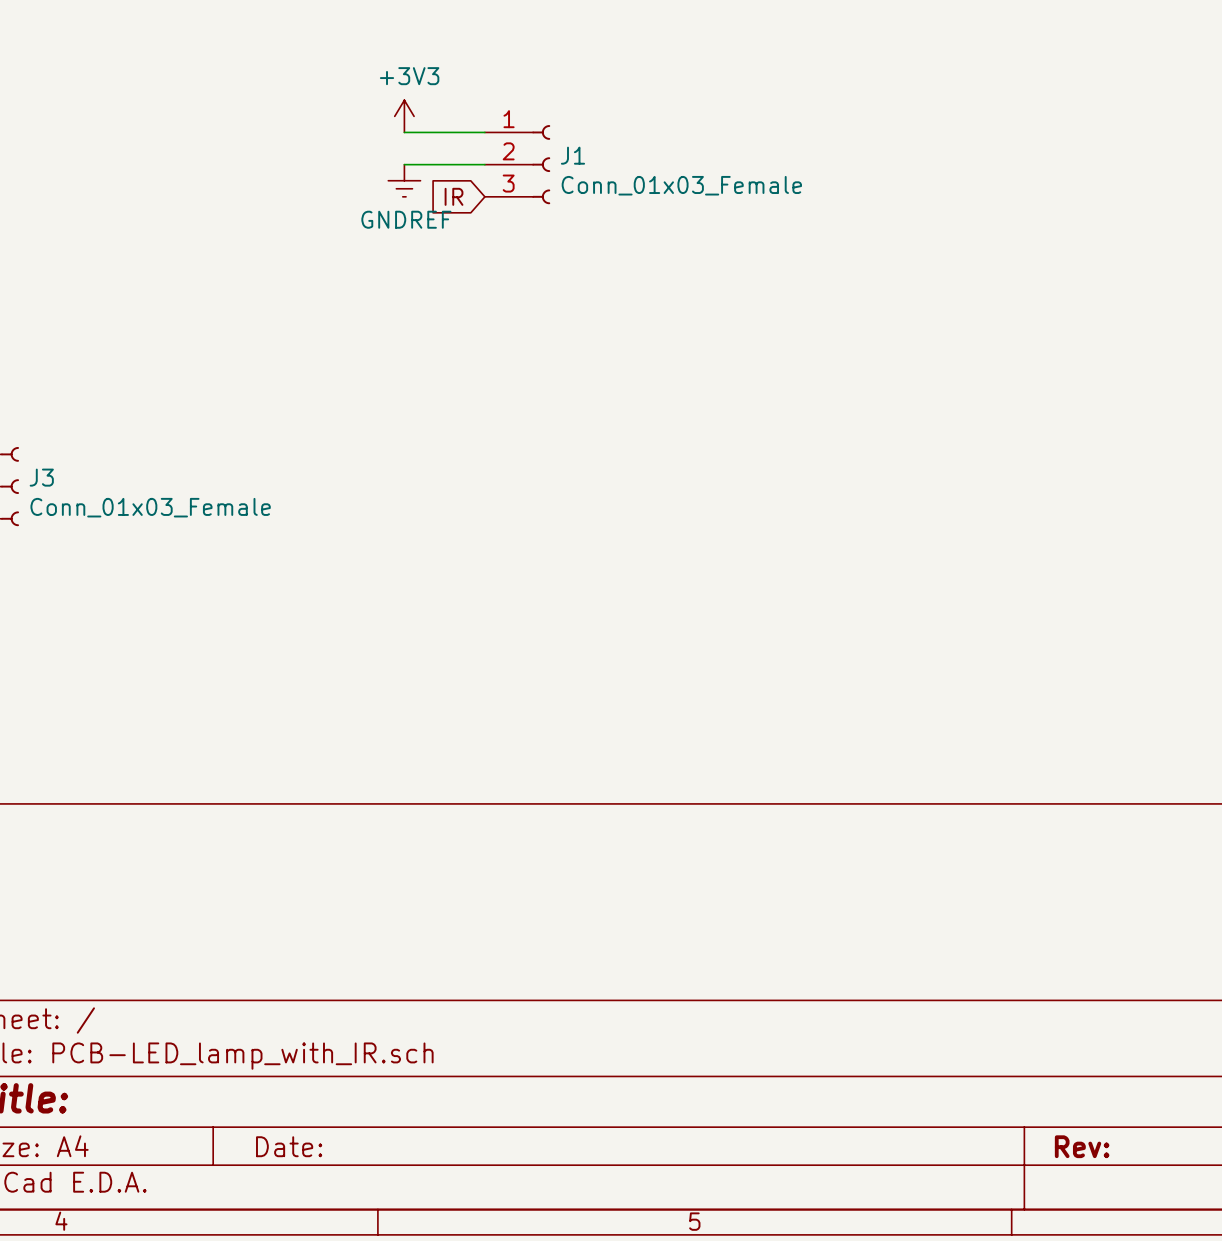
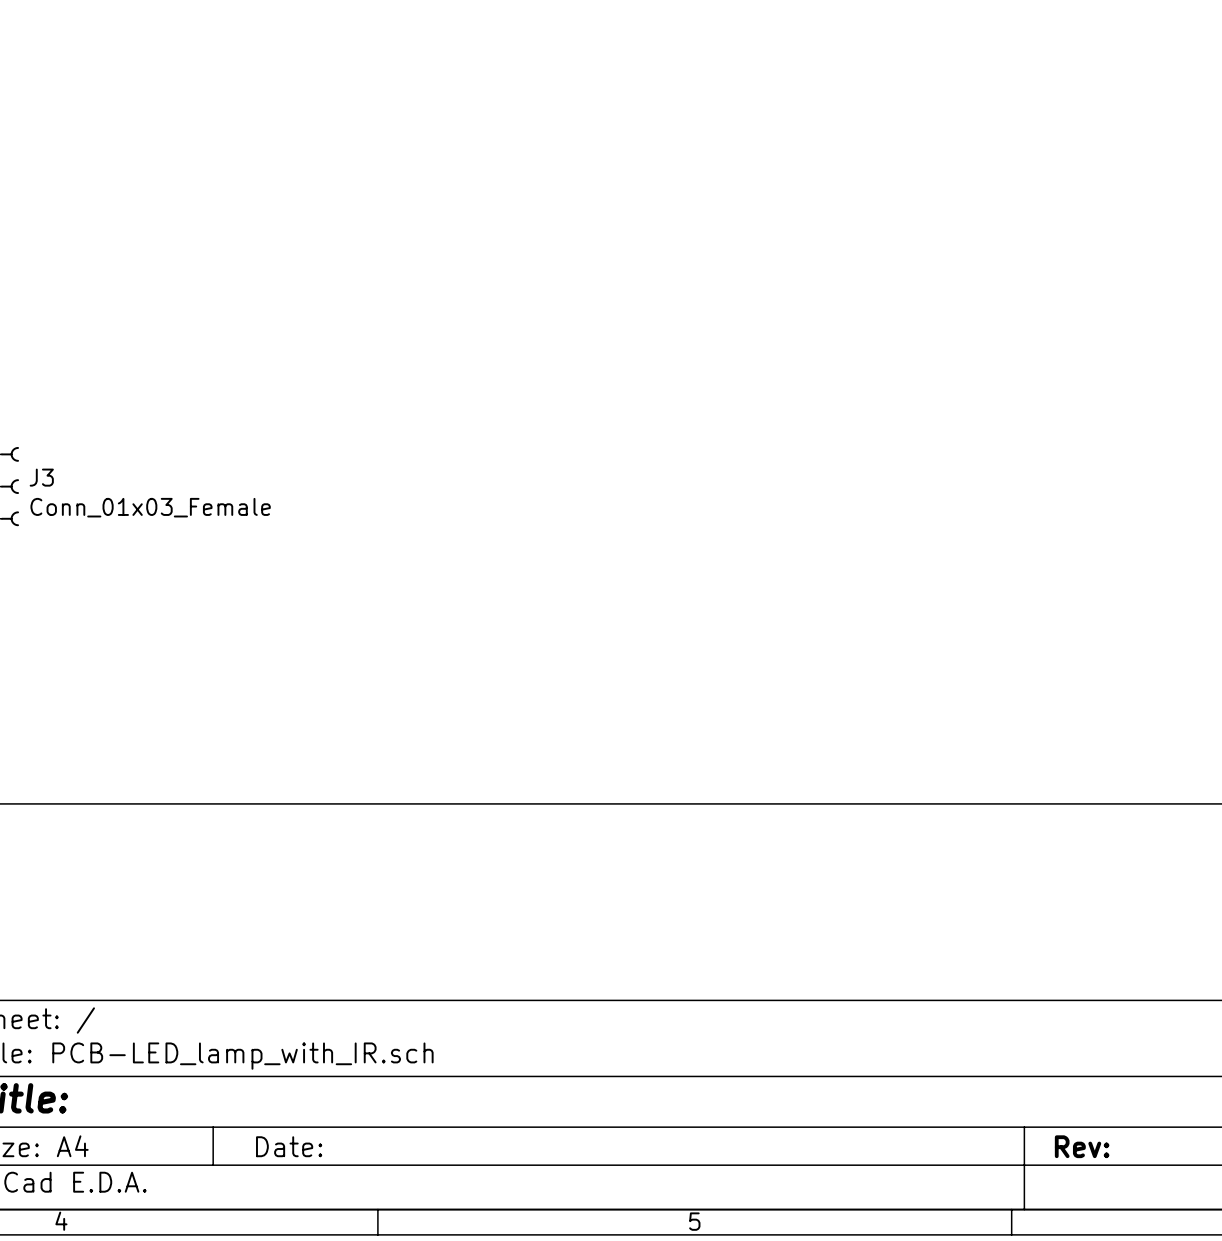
power symbol: +3V3 (404, 116) -> none
wire: (404, 132) (484, 132) -> none
wire: (404, 164) (484, 164) -> none
J1: Conn_01x03_Female (517, 164) -> none
power symbol: GNDREF (404, 180) -> none
global label: IR (454, 196) -> none

